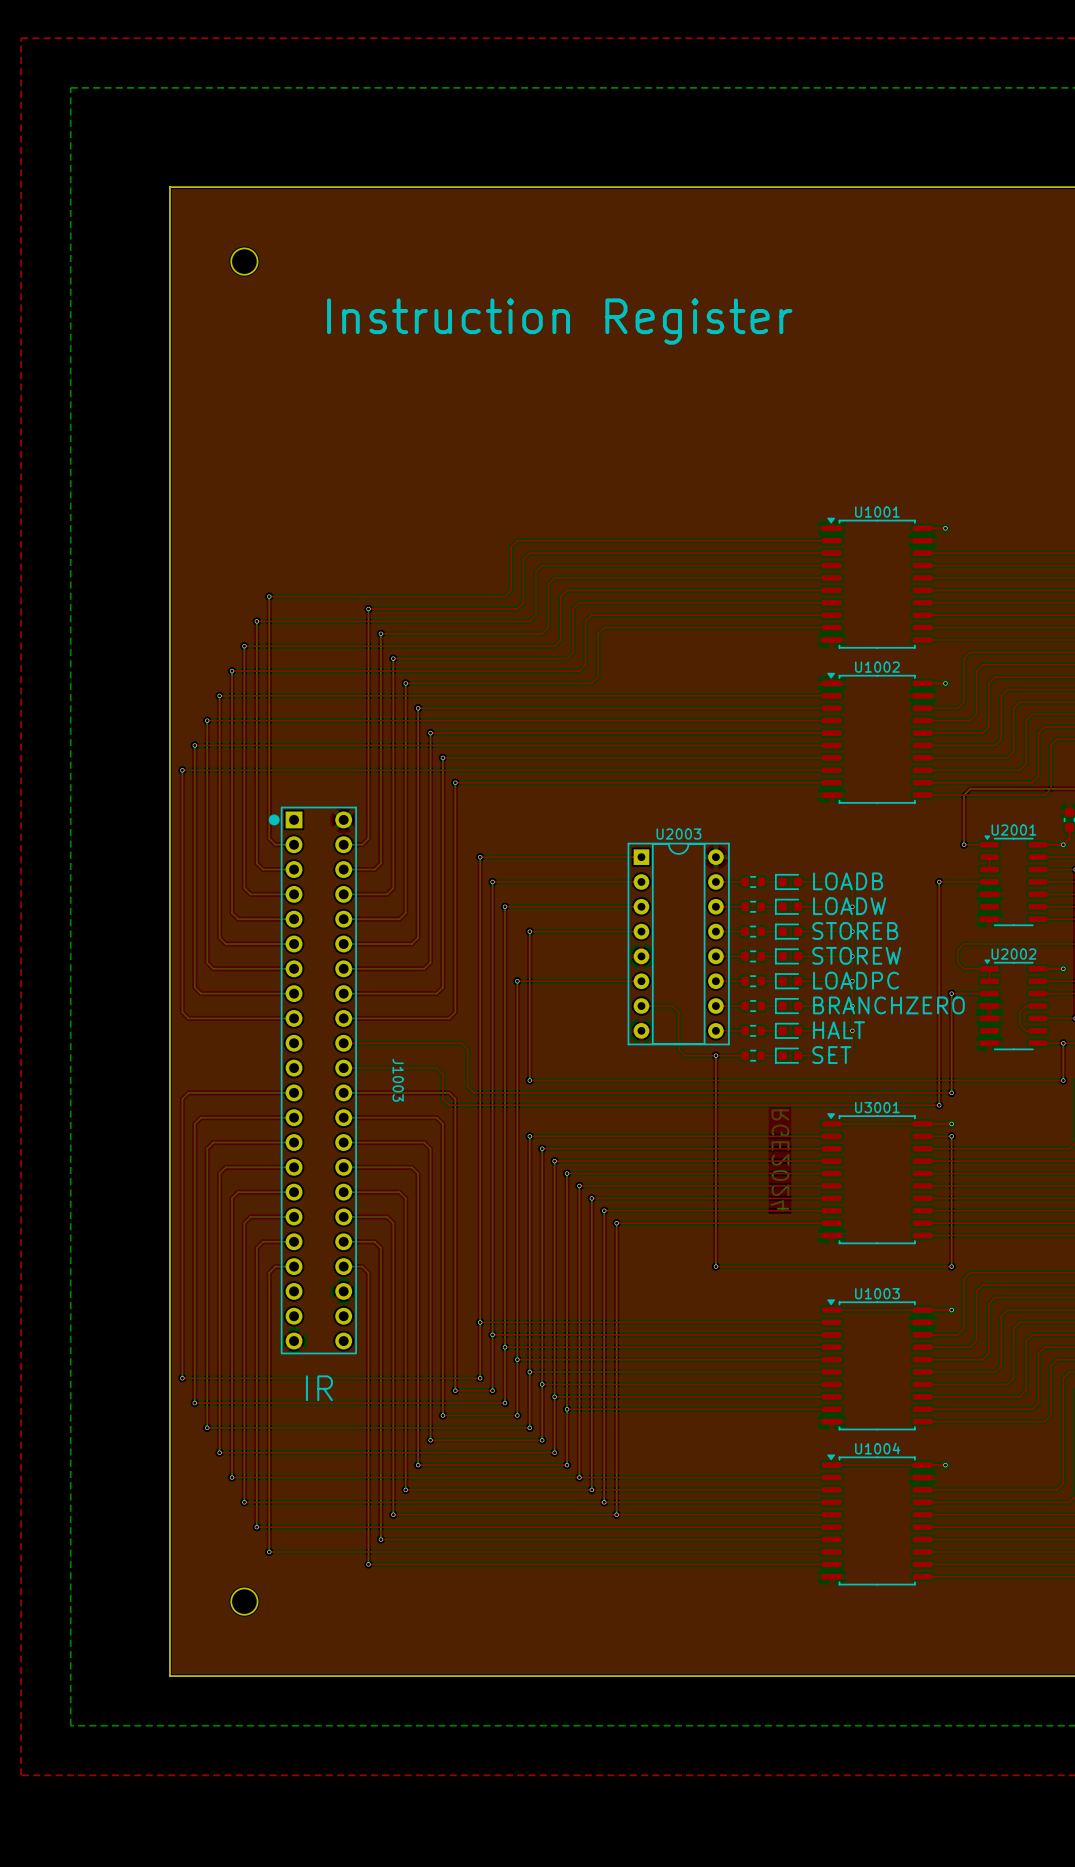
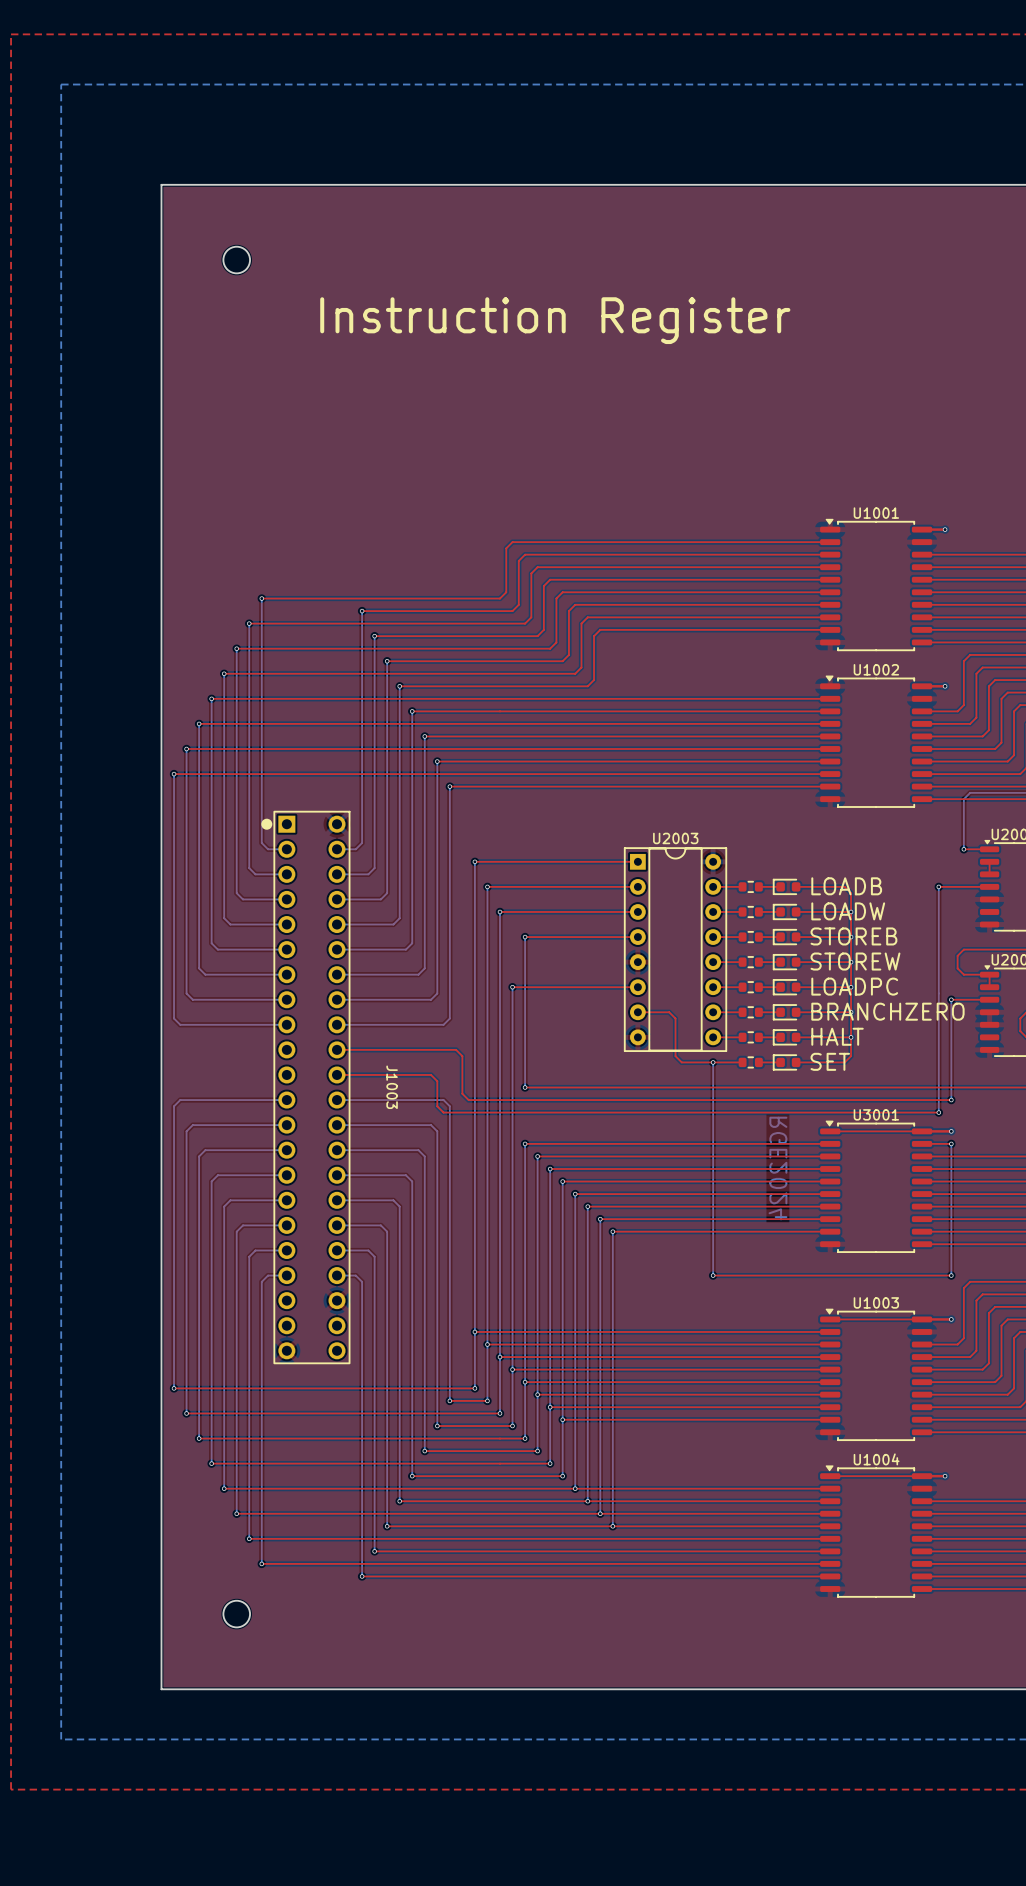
text: IR (319, 1388) -> none

